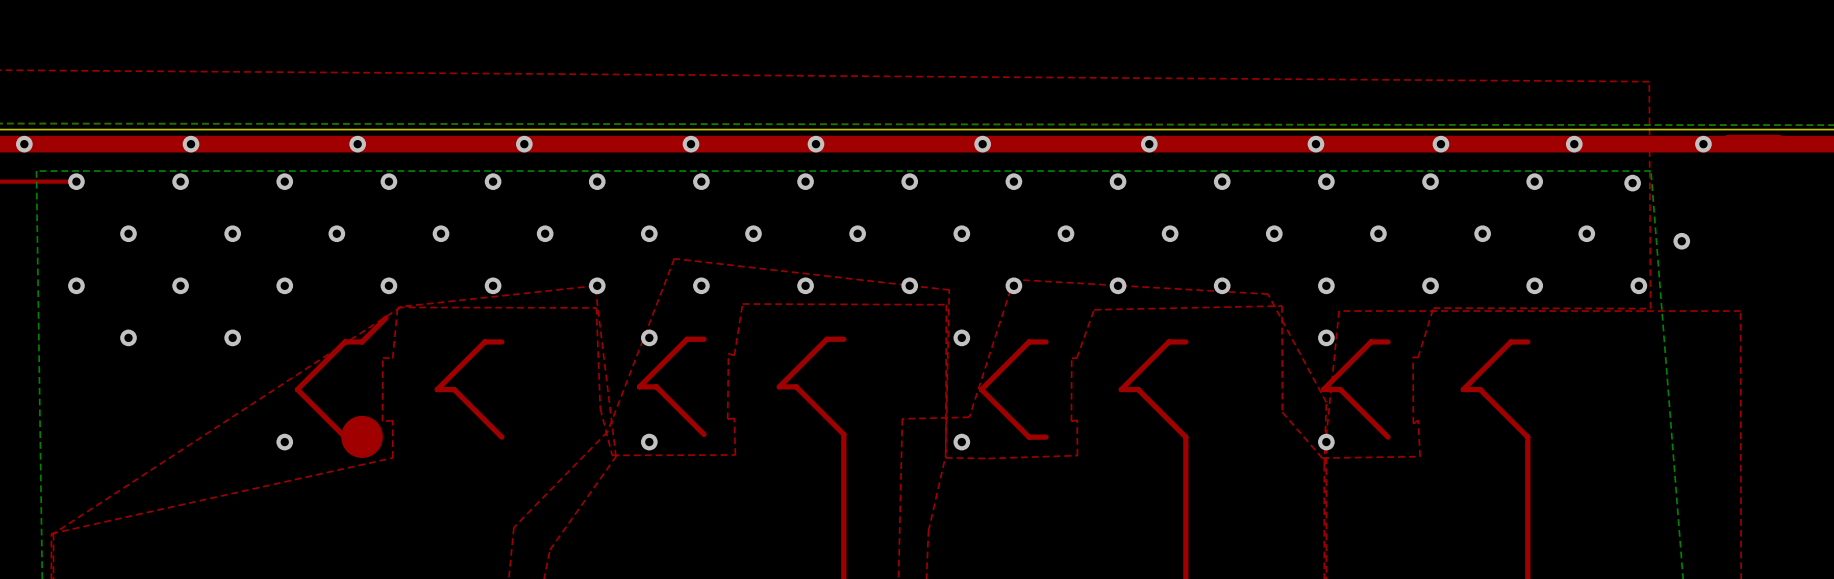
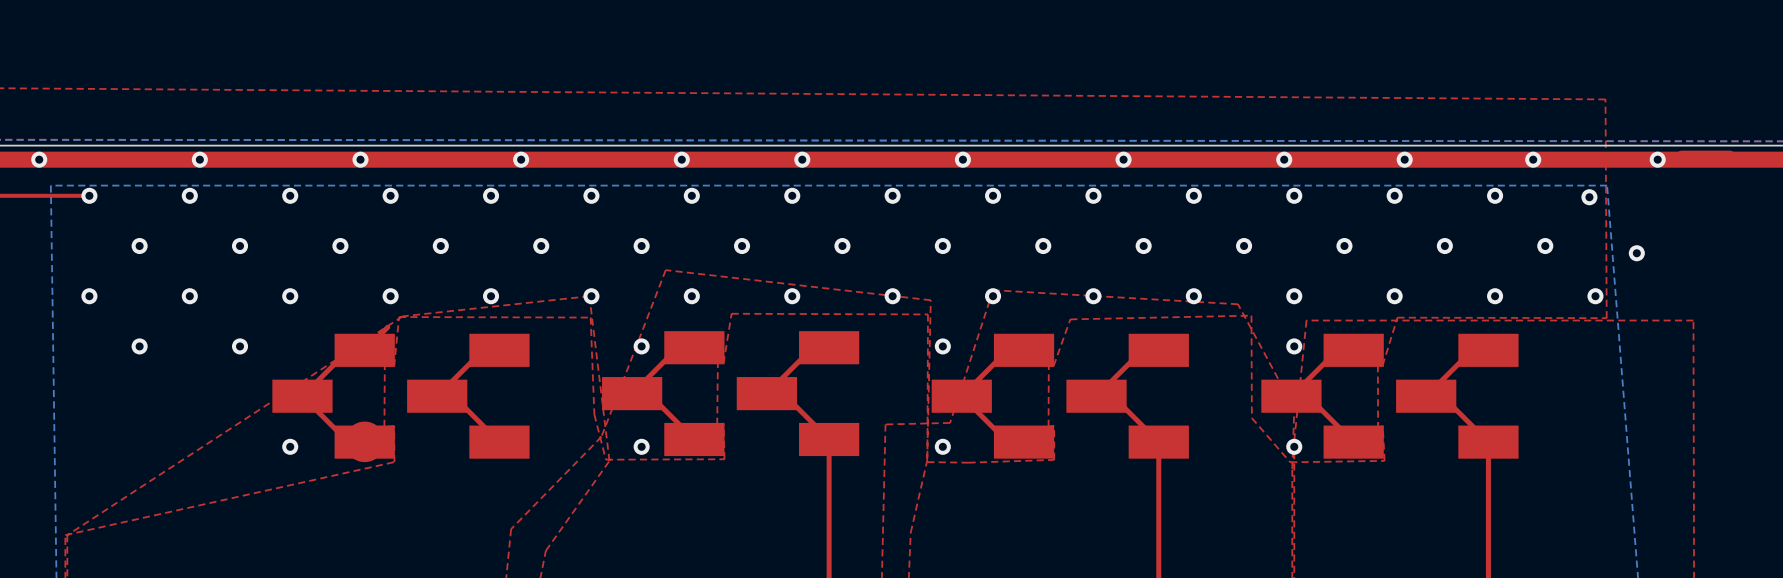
part: none -> (730, 393)
part: none -> (400, 396)
part: none -> (1060, 396)
part: none -> (1389, 396)

